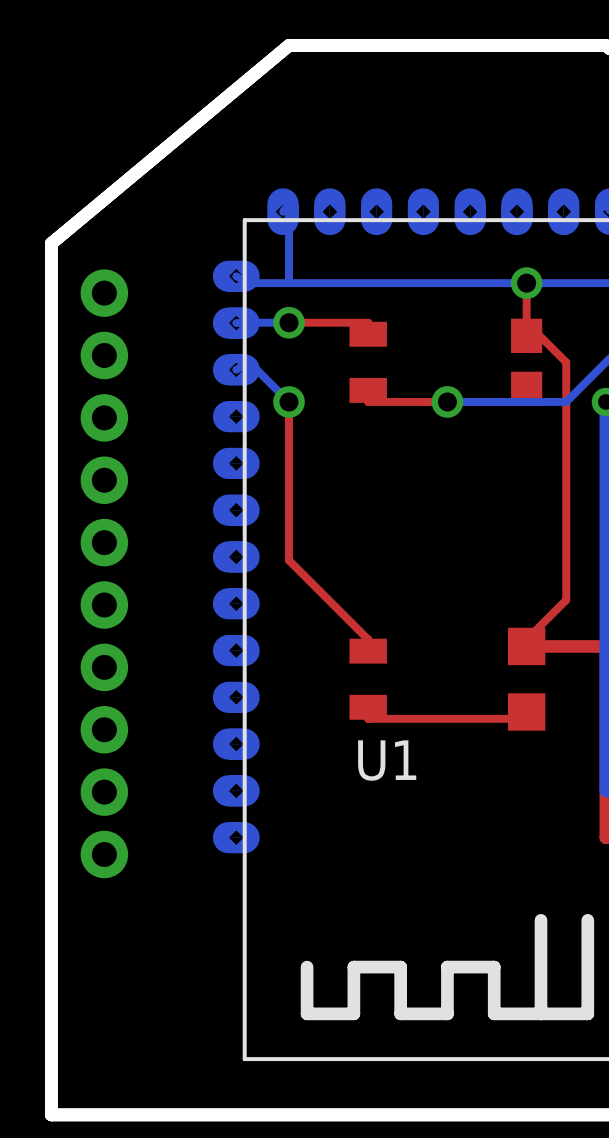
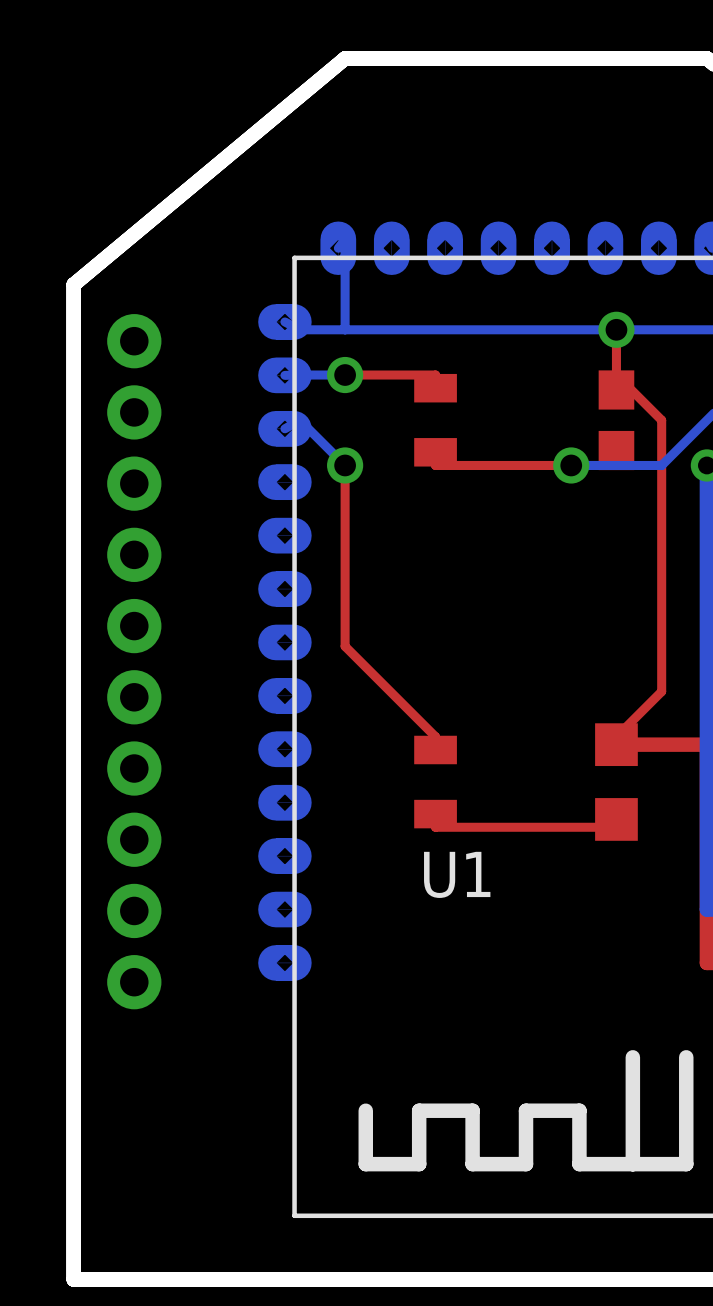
via position: (447, 401) -> (571, 465)
bottom track: (487, 401) (447, 401) -> none

